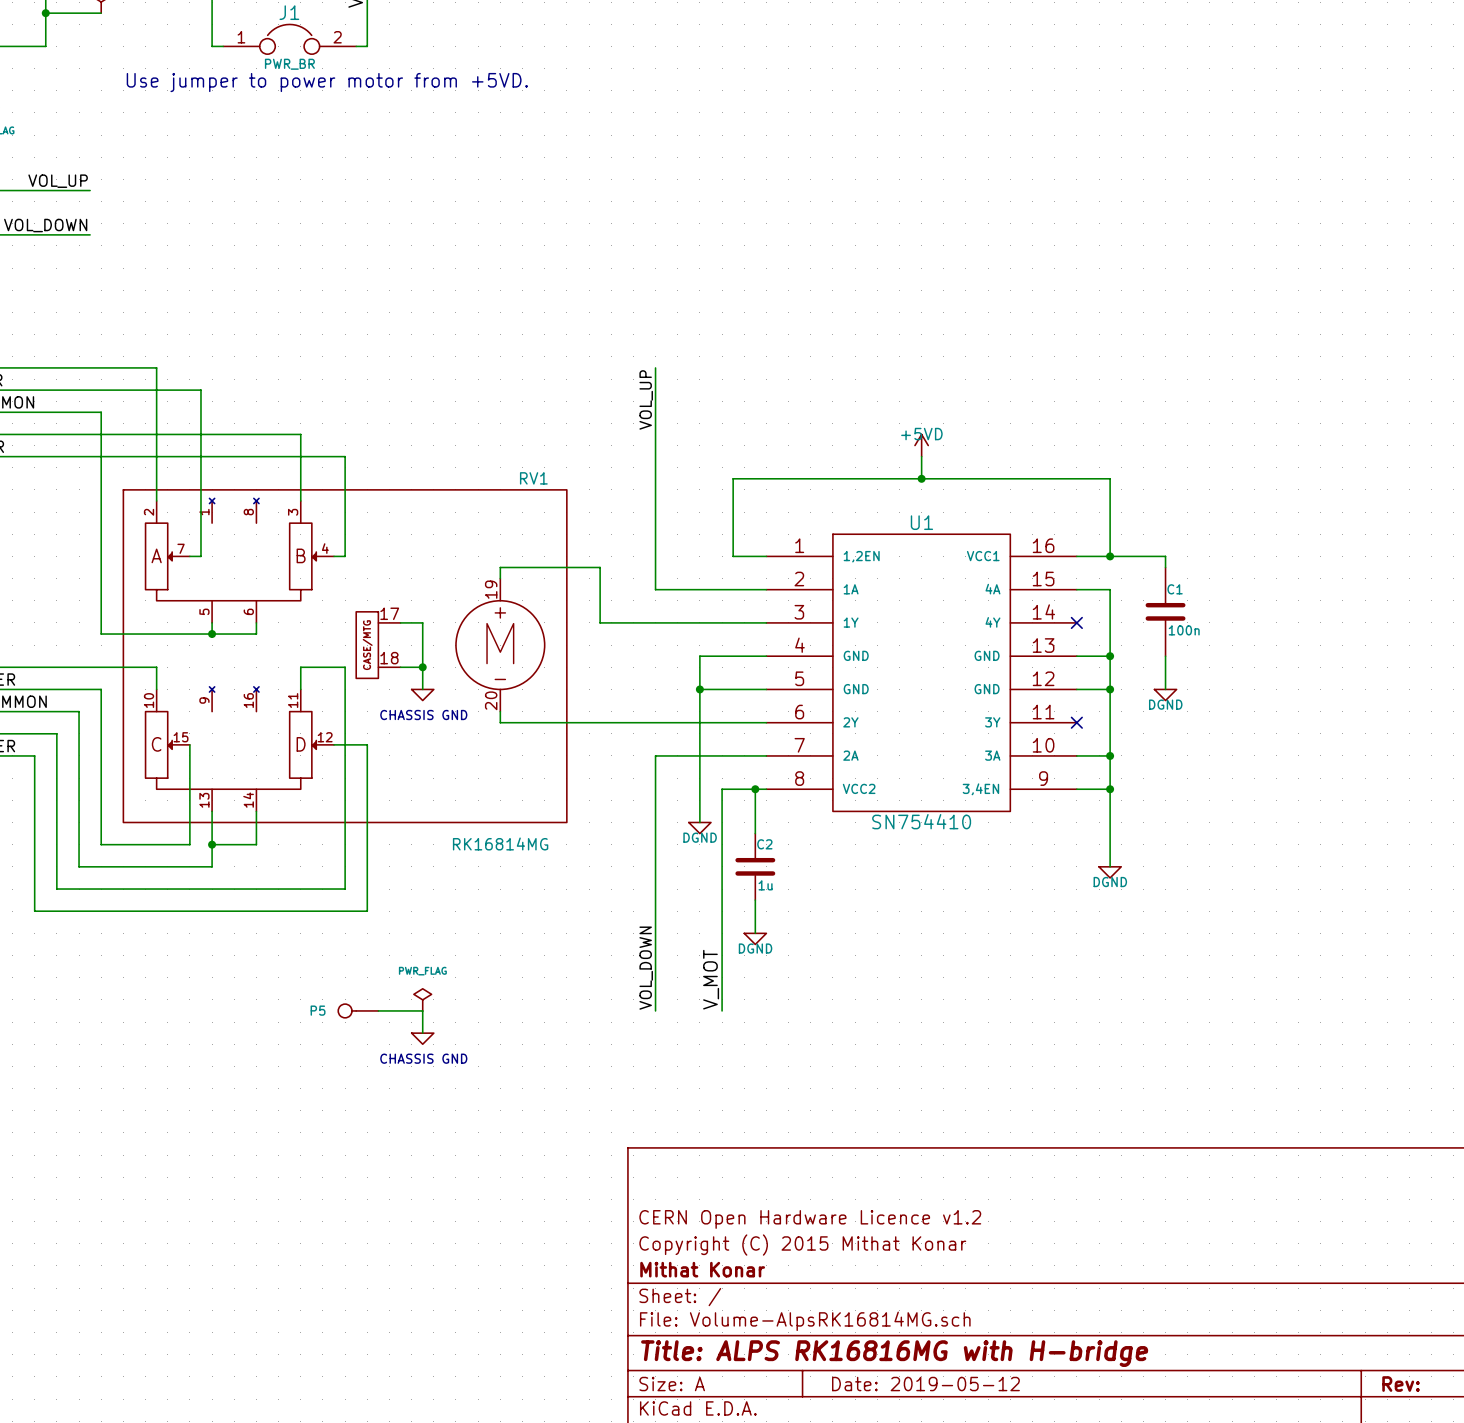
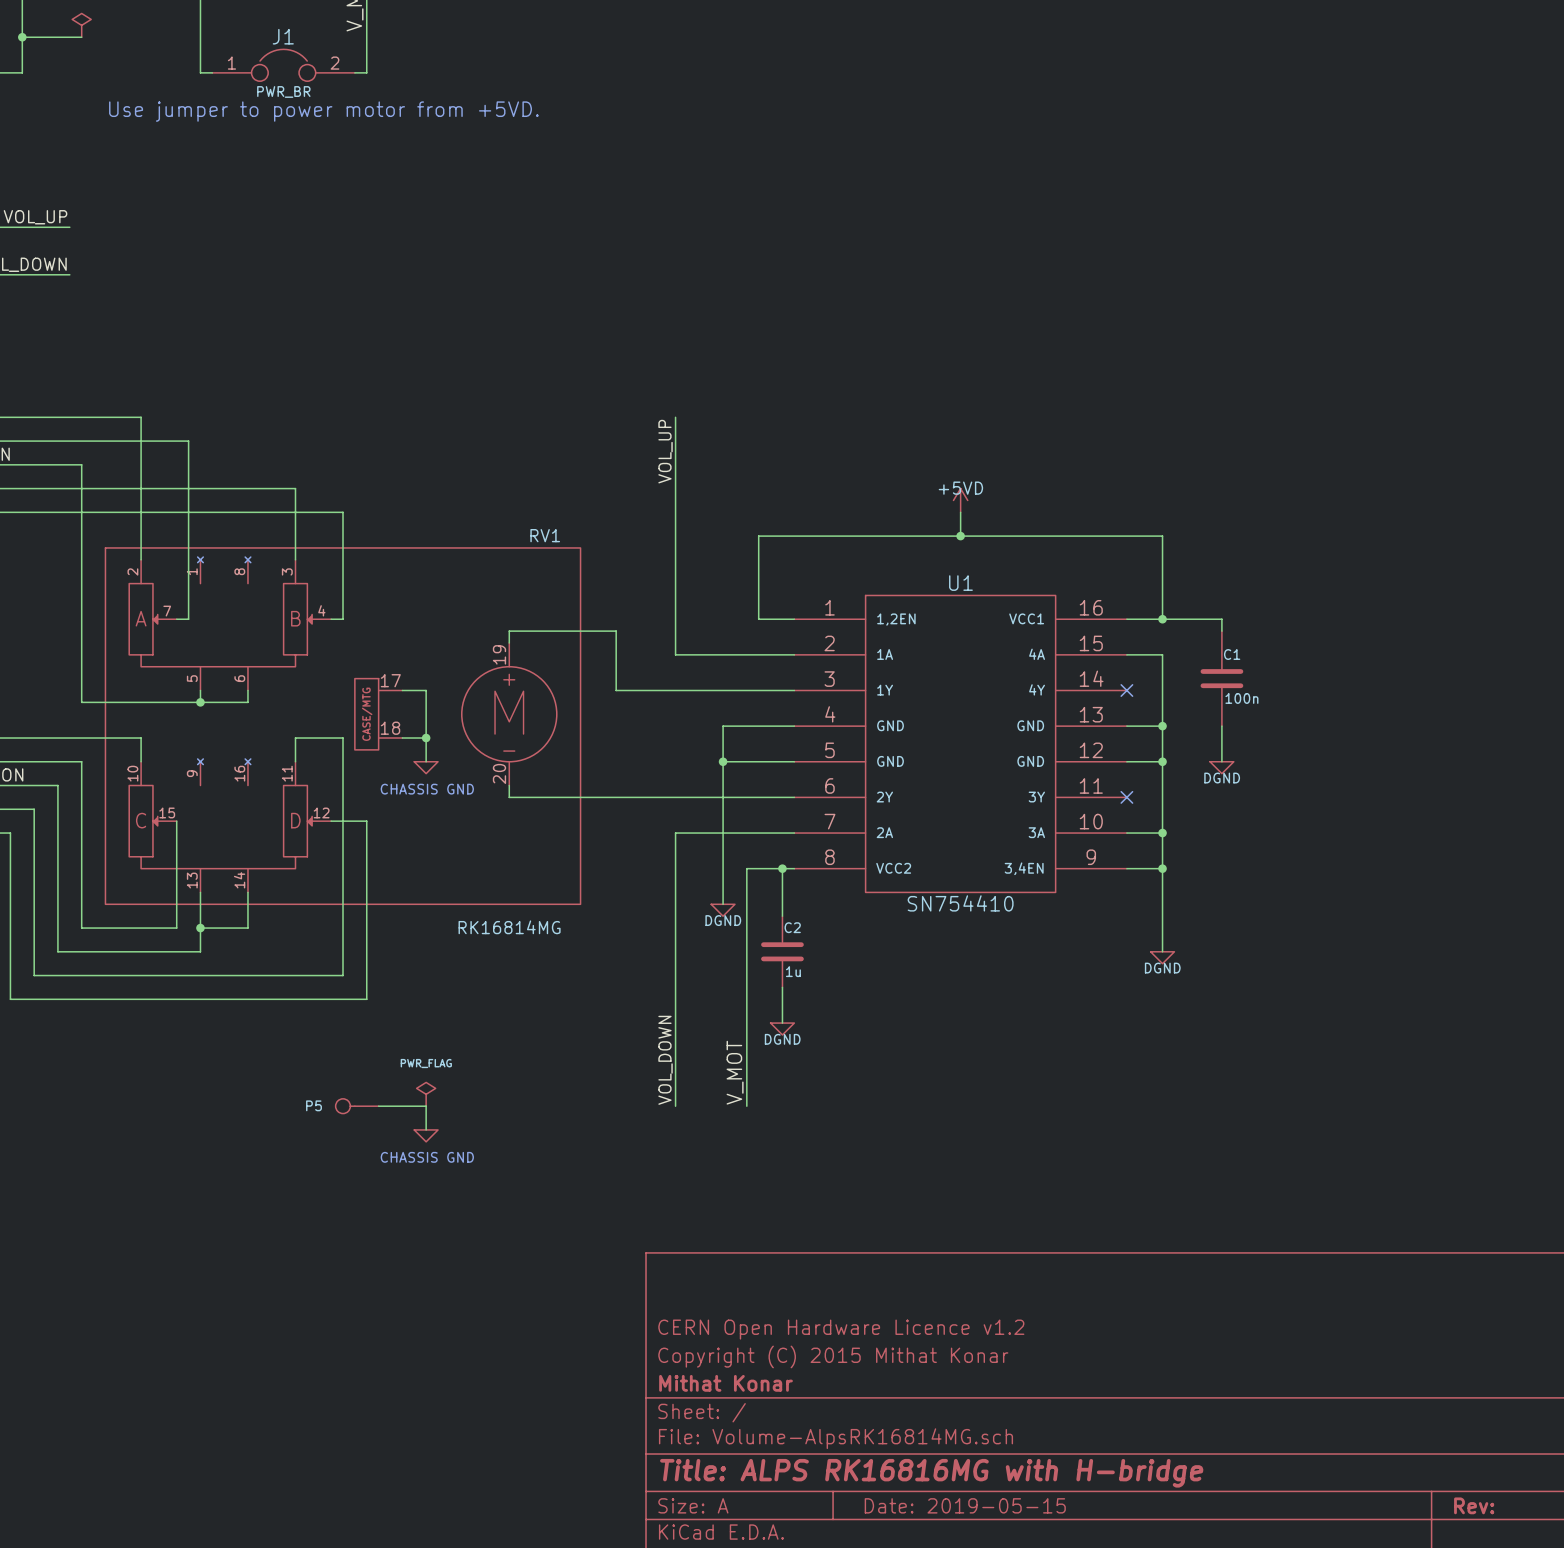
title block: Date: 2019-05-12 (925, 1384) -> Date: 2019-05-15 (965, 1505)

